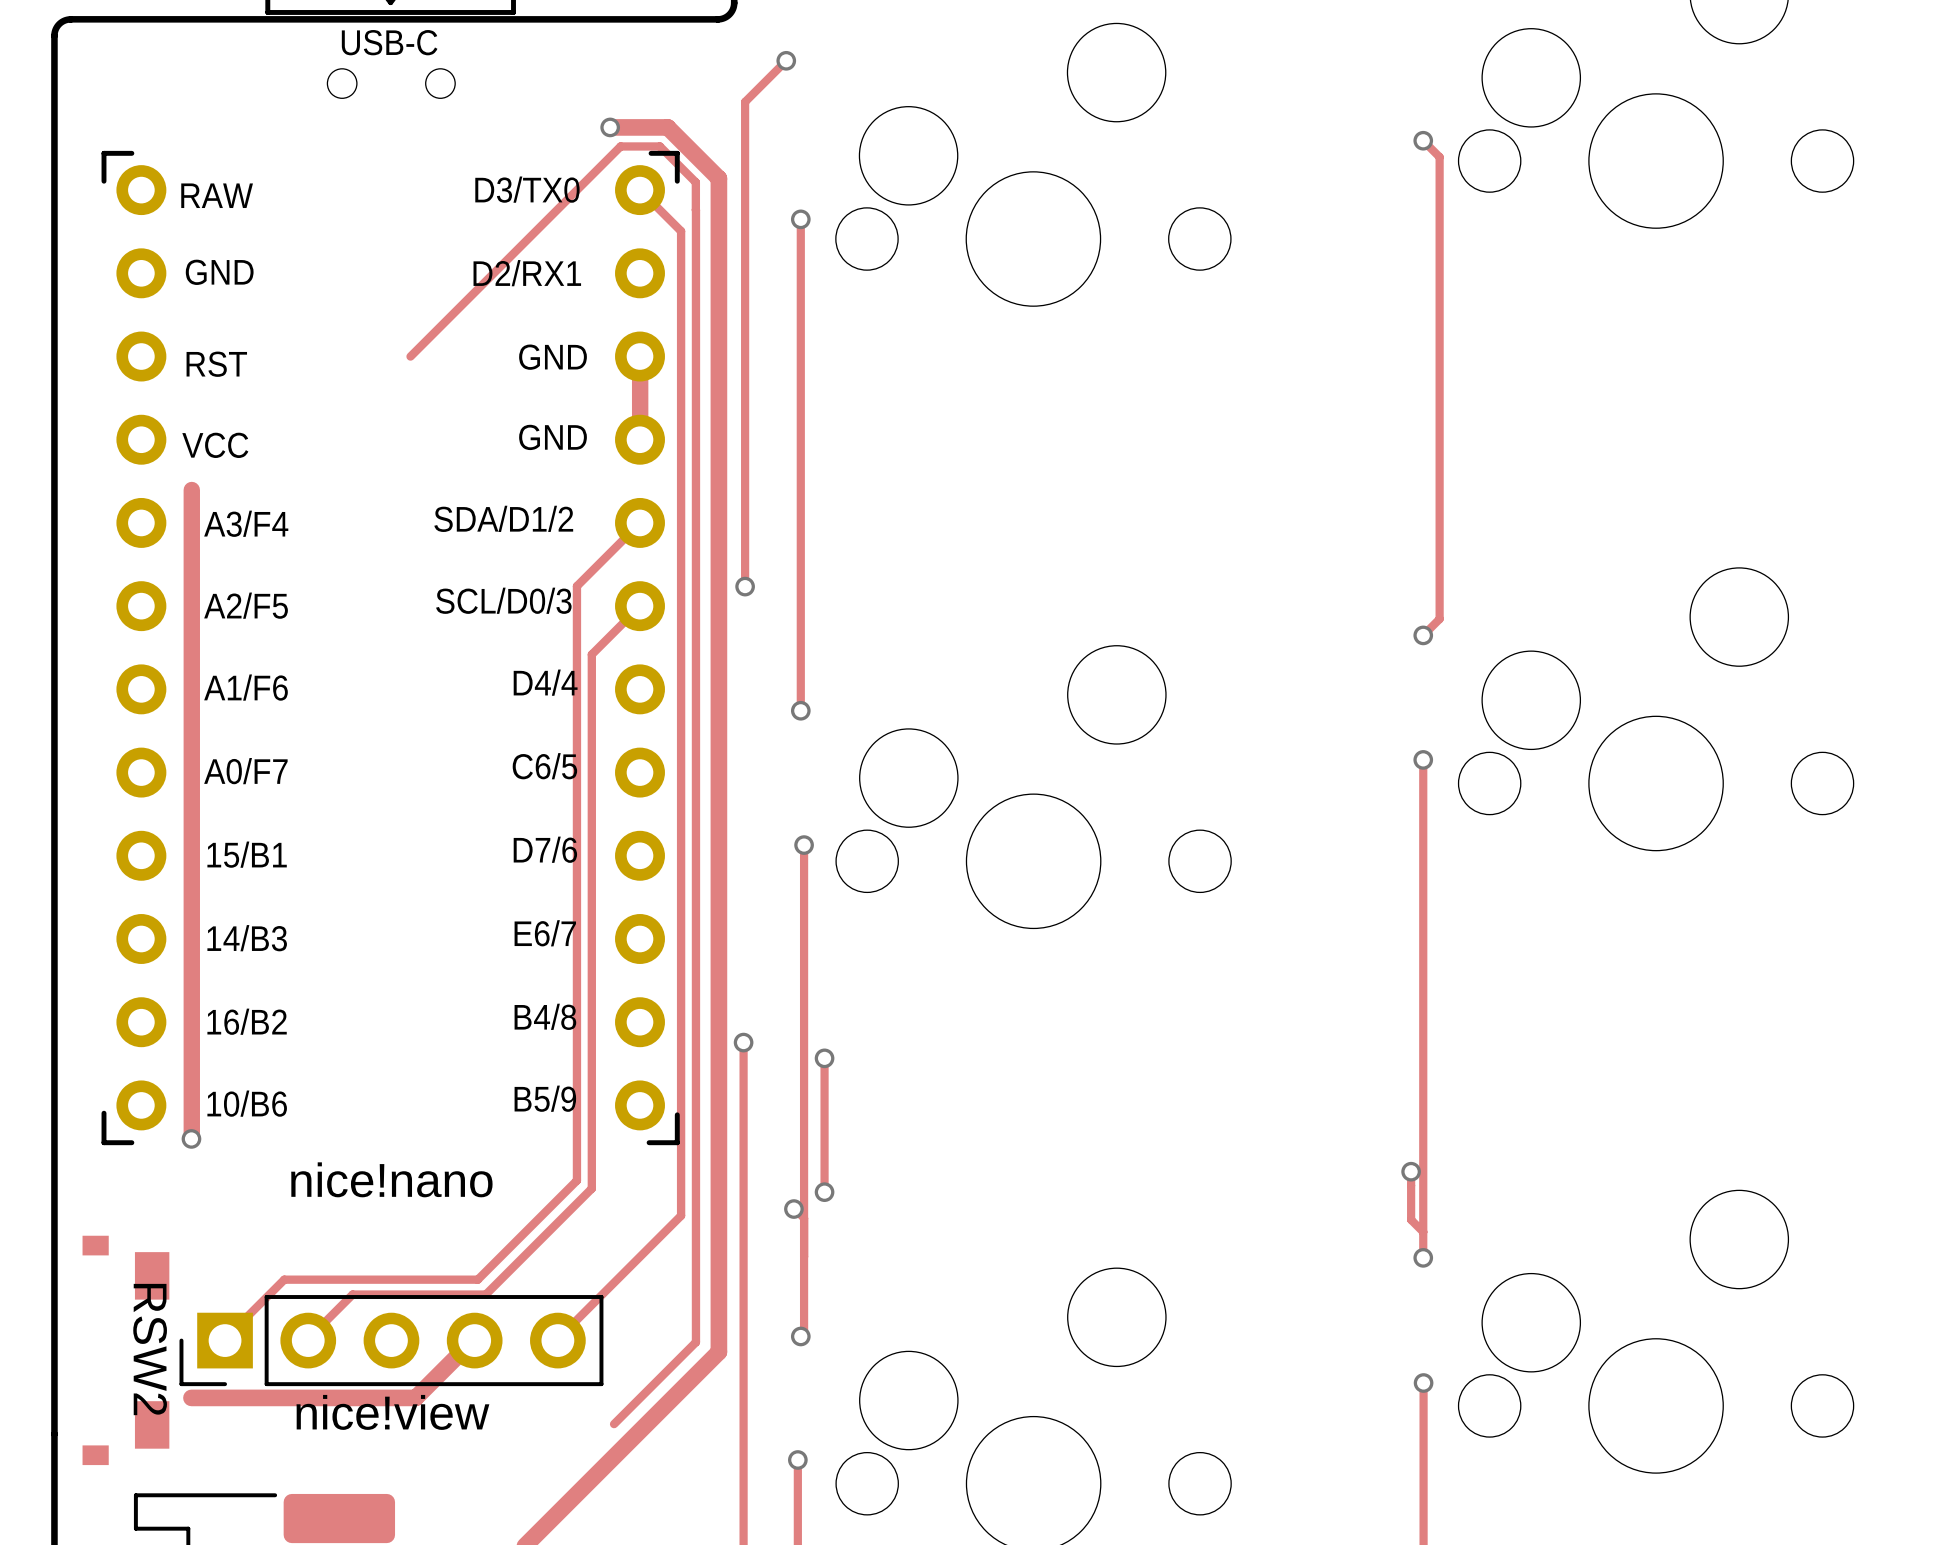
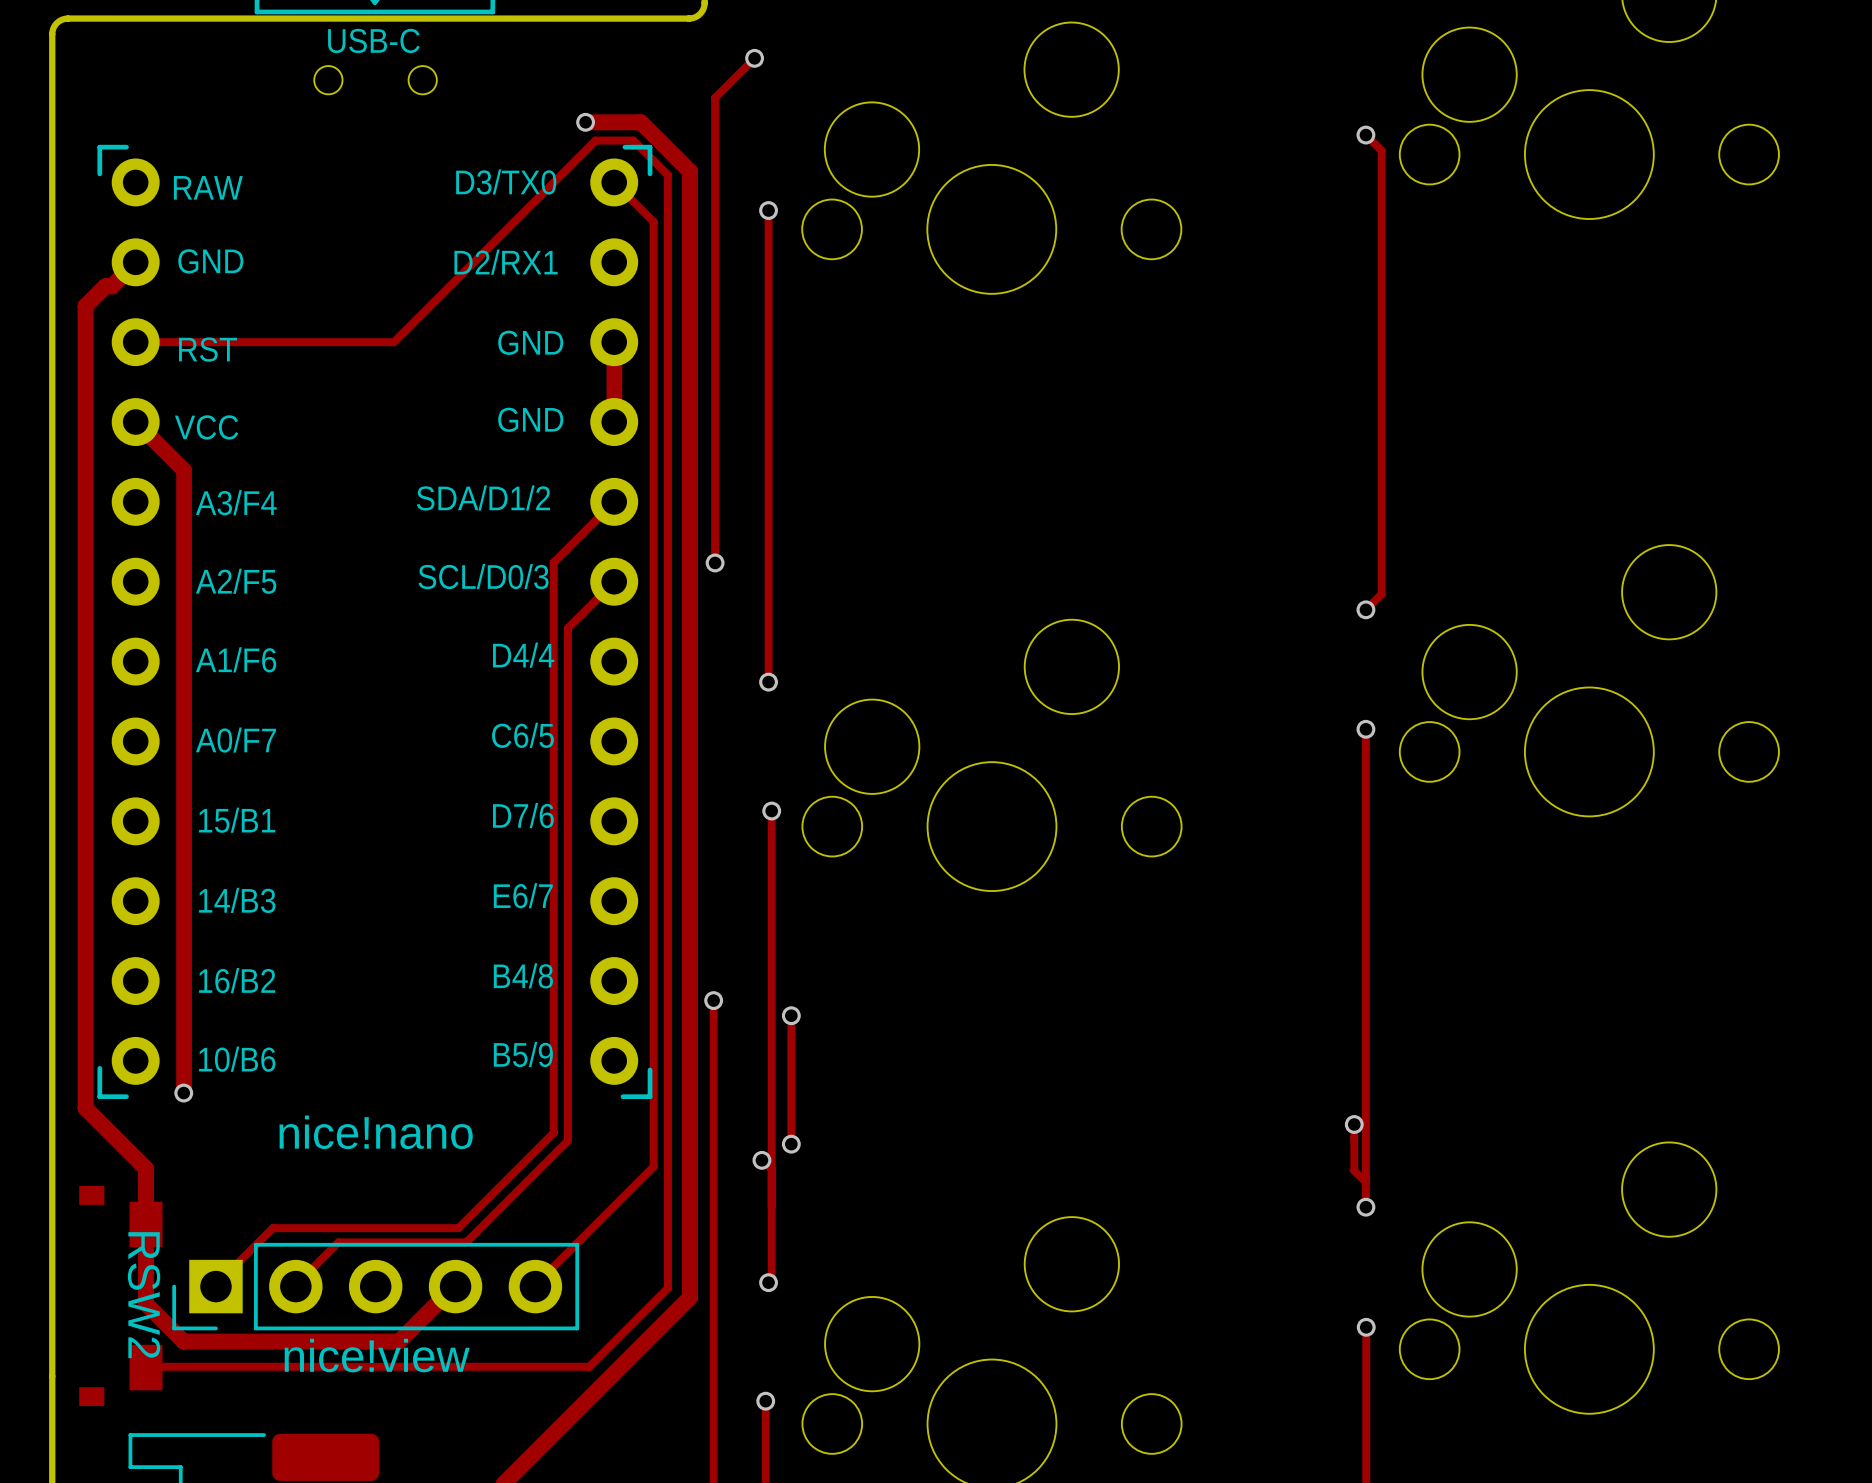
track: none -> (135, 262) (111, 286) (105, 286) (85, 306) (85, 1108) (146, 1168) (146, 1303) (183, 1341)
track: none -> (135, 342) (393, 342)
track: none -> (135, 422) (184, 470)
track: none -> (146, 1366) (589, 1366)

